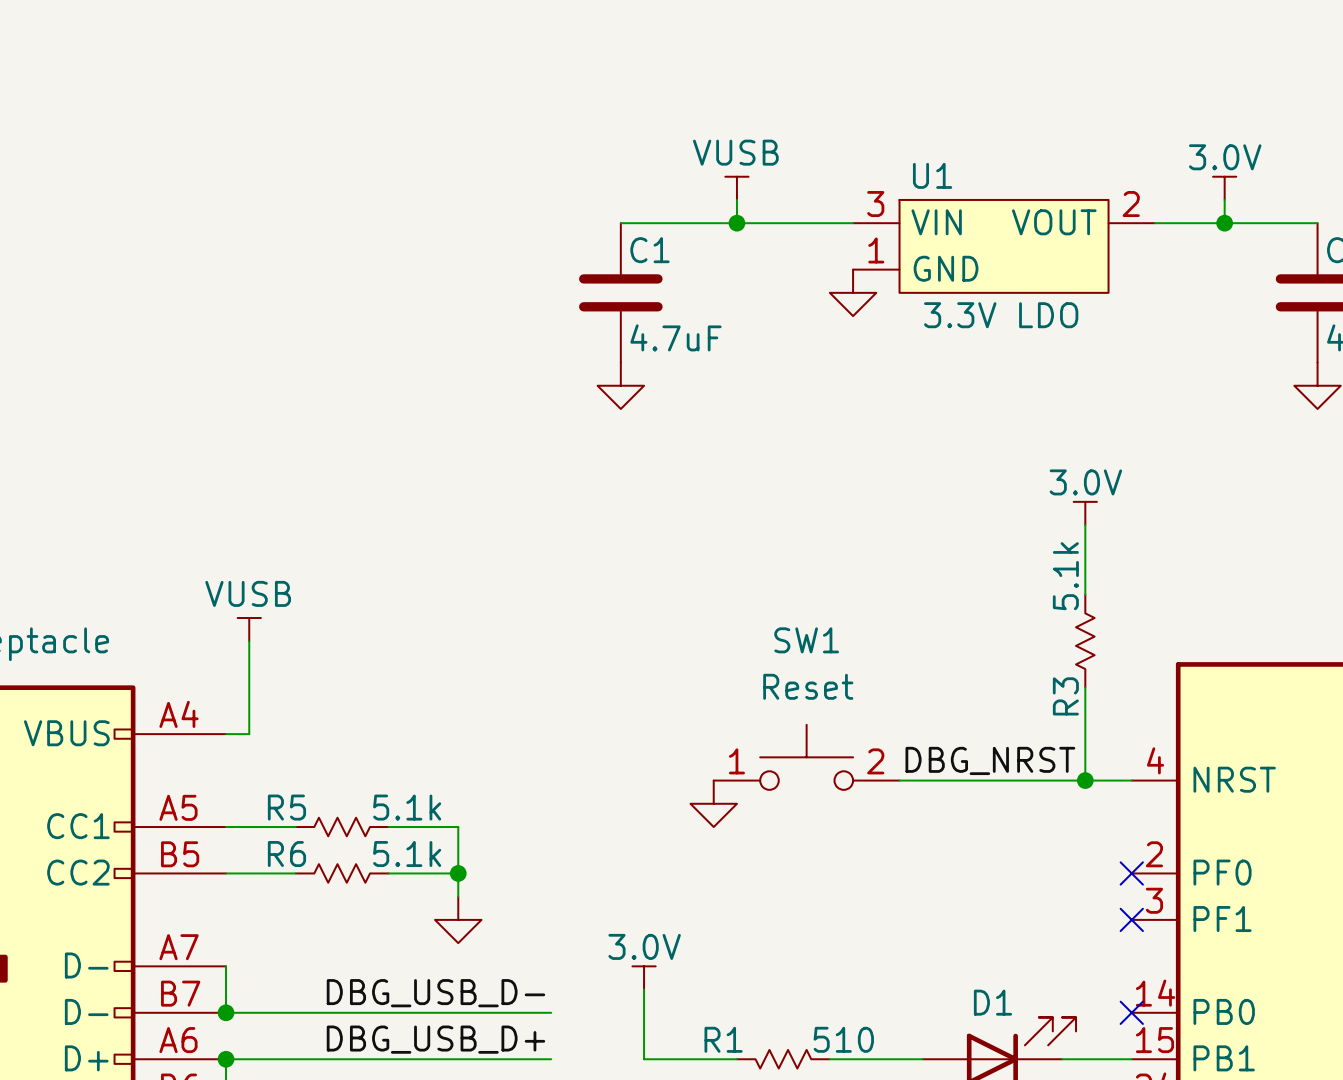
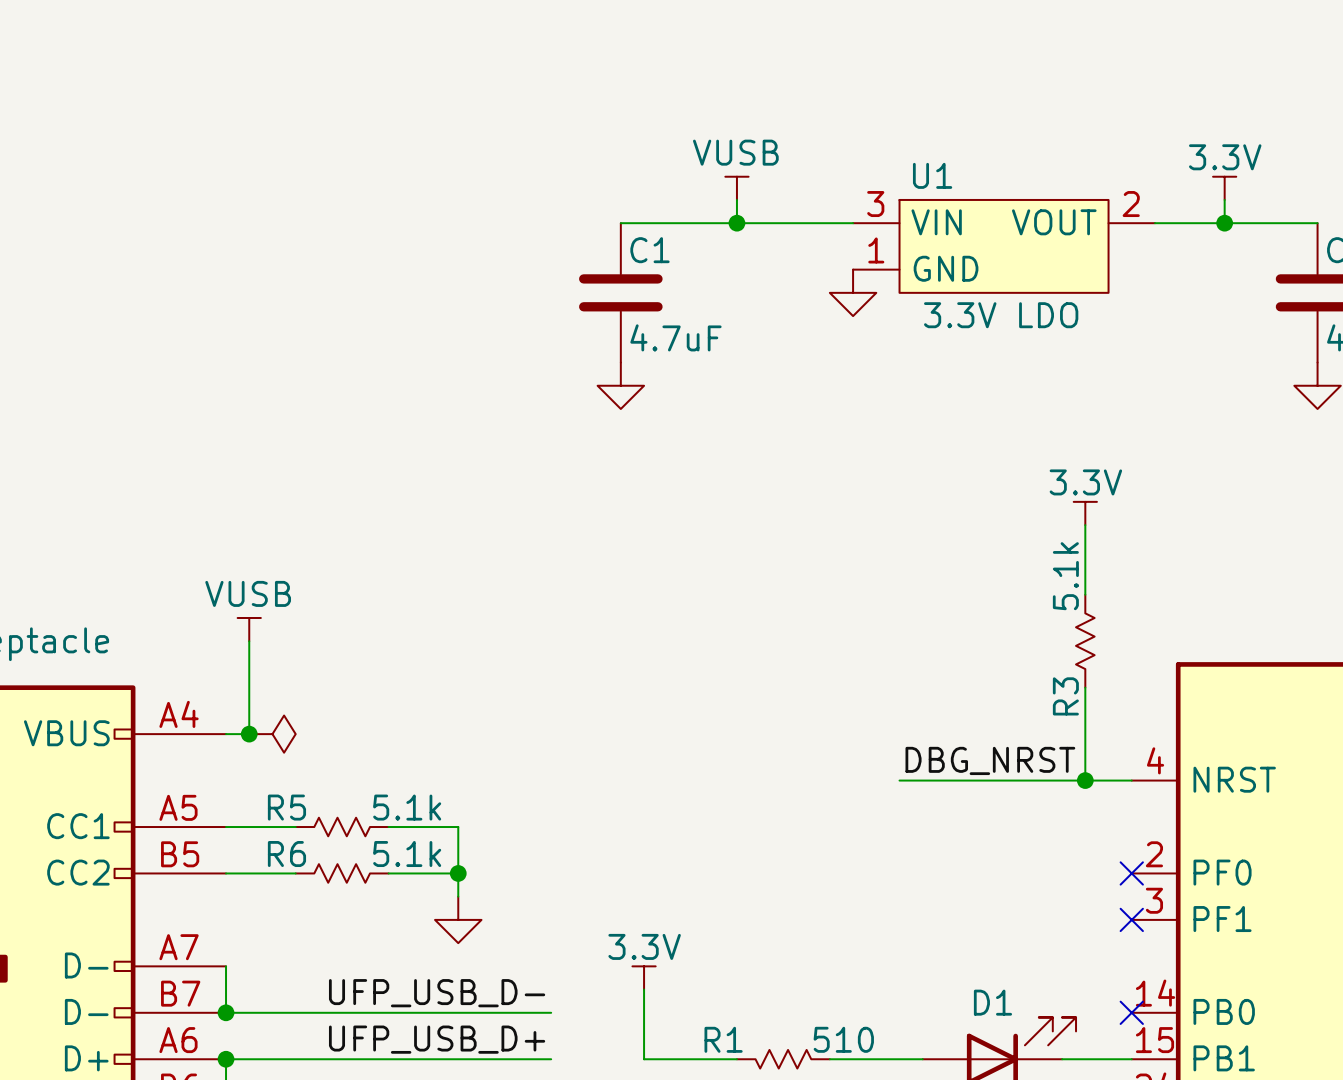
power symbol: 3.0V (1224, 188) -> 3.3V (1224, 188)
power symbol: 3.0V (1085, 513) -> 3.3V (1085, 513)
junction: none -> (249, 734)
power symbol: none -> (272, 734)
SW1: (806, 757) -> none
power symbol: (713, 803) -> none
power symbol: 3.0V (644, 977) -> 3.3V (644, 977)
label: DBG_USB_D- (435, 993) -> UFP_USB_D- (437, 993)
label: DBG_USB_D+ (435, 1039) -> UFP_USB_D+ (437, 1039)

